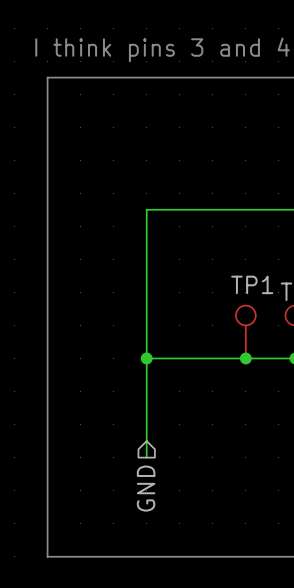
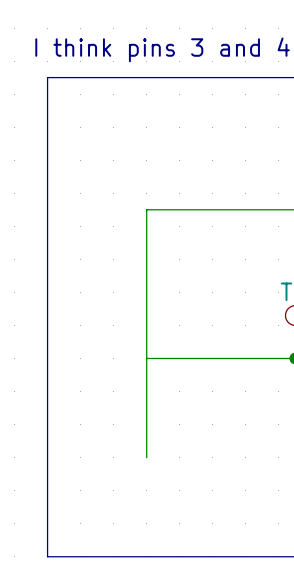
TP1: (245, 332) -> none
junction: (146, 358) -> none
junction: (245, 358) -> none
hierarchical label: GND (146, 488) -> none

